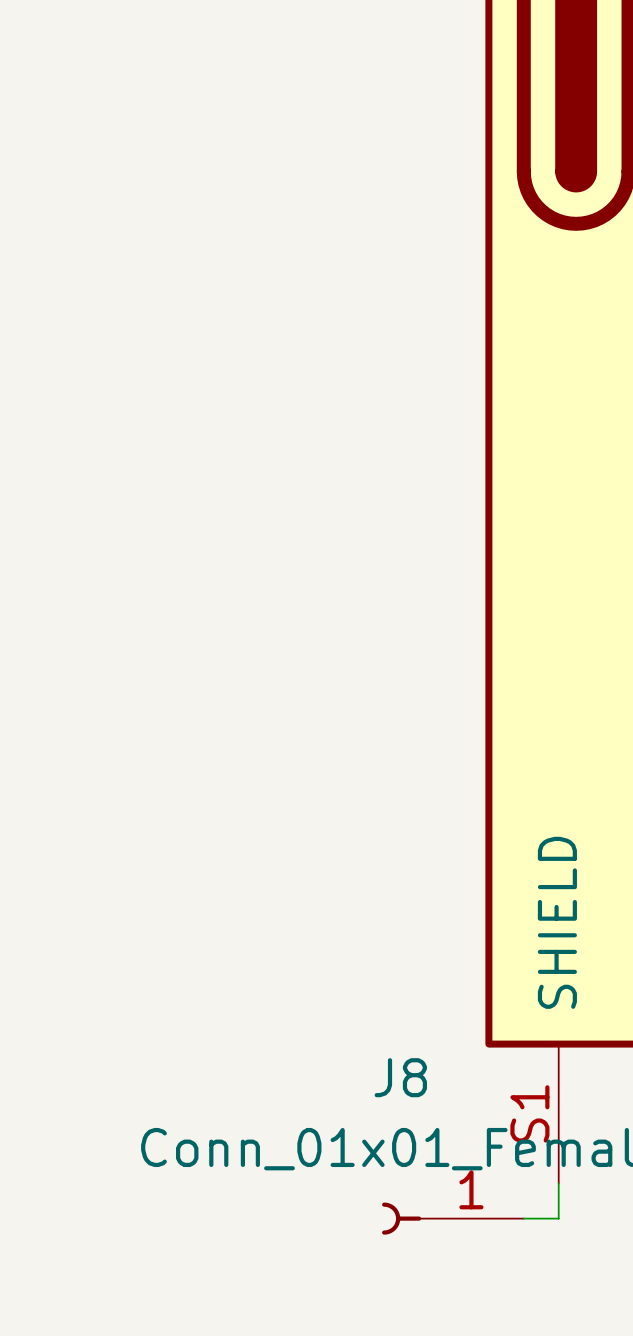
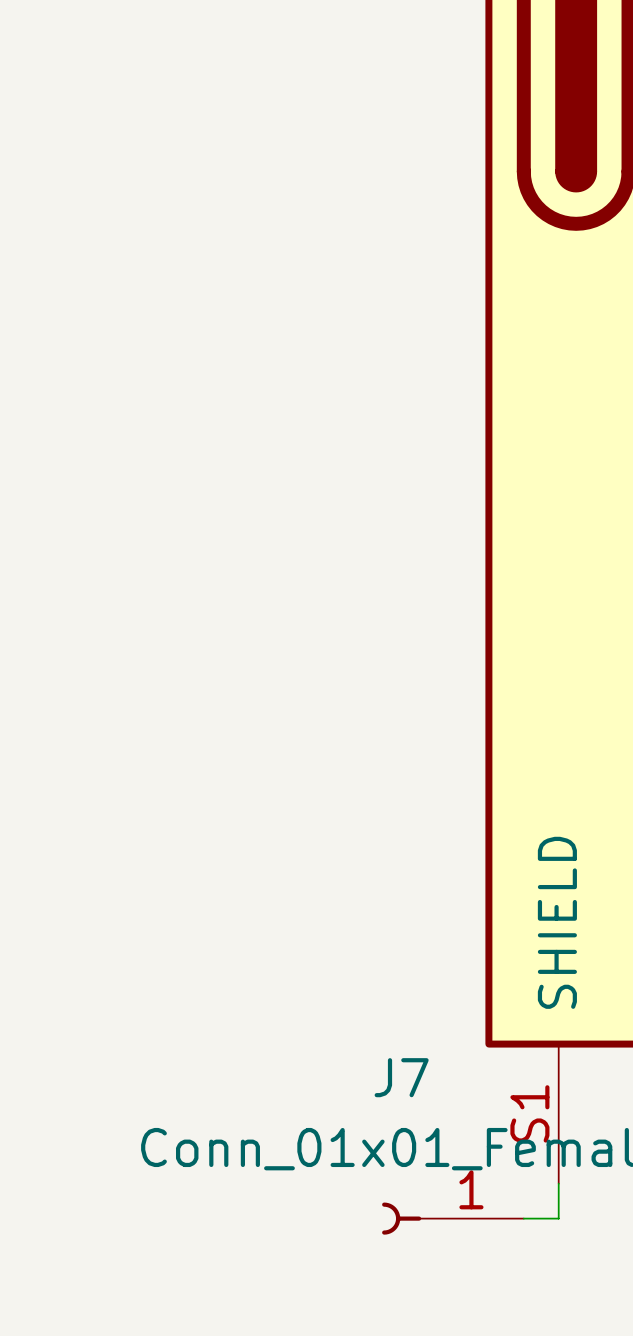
J8 name: J8 (400, 1077) -> J7 (401, 1077)

